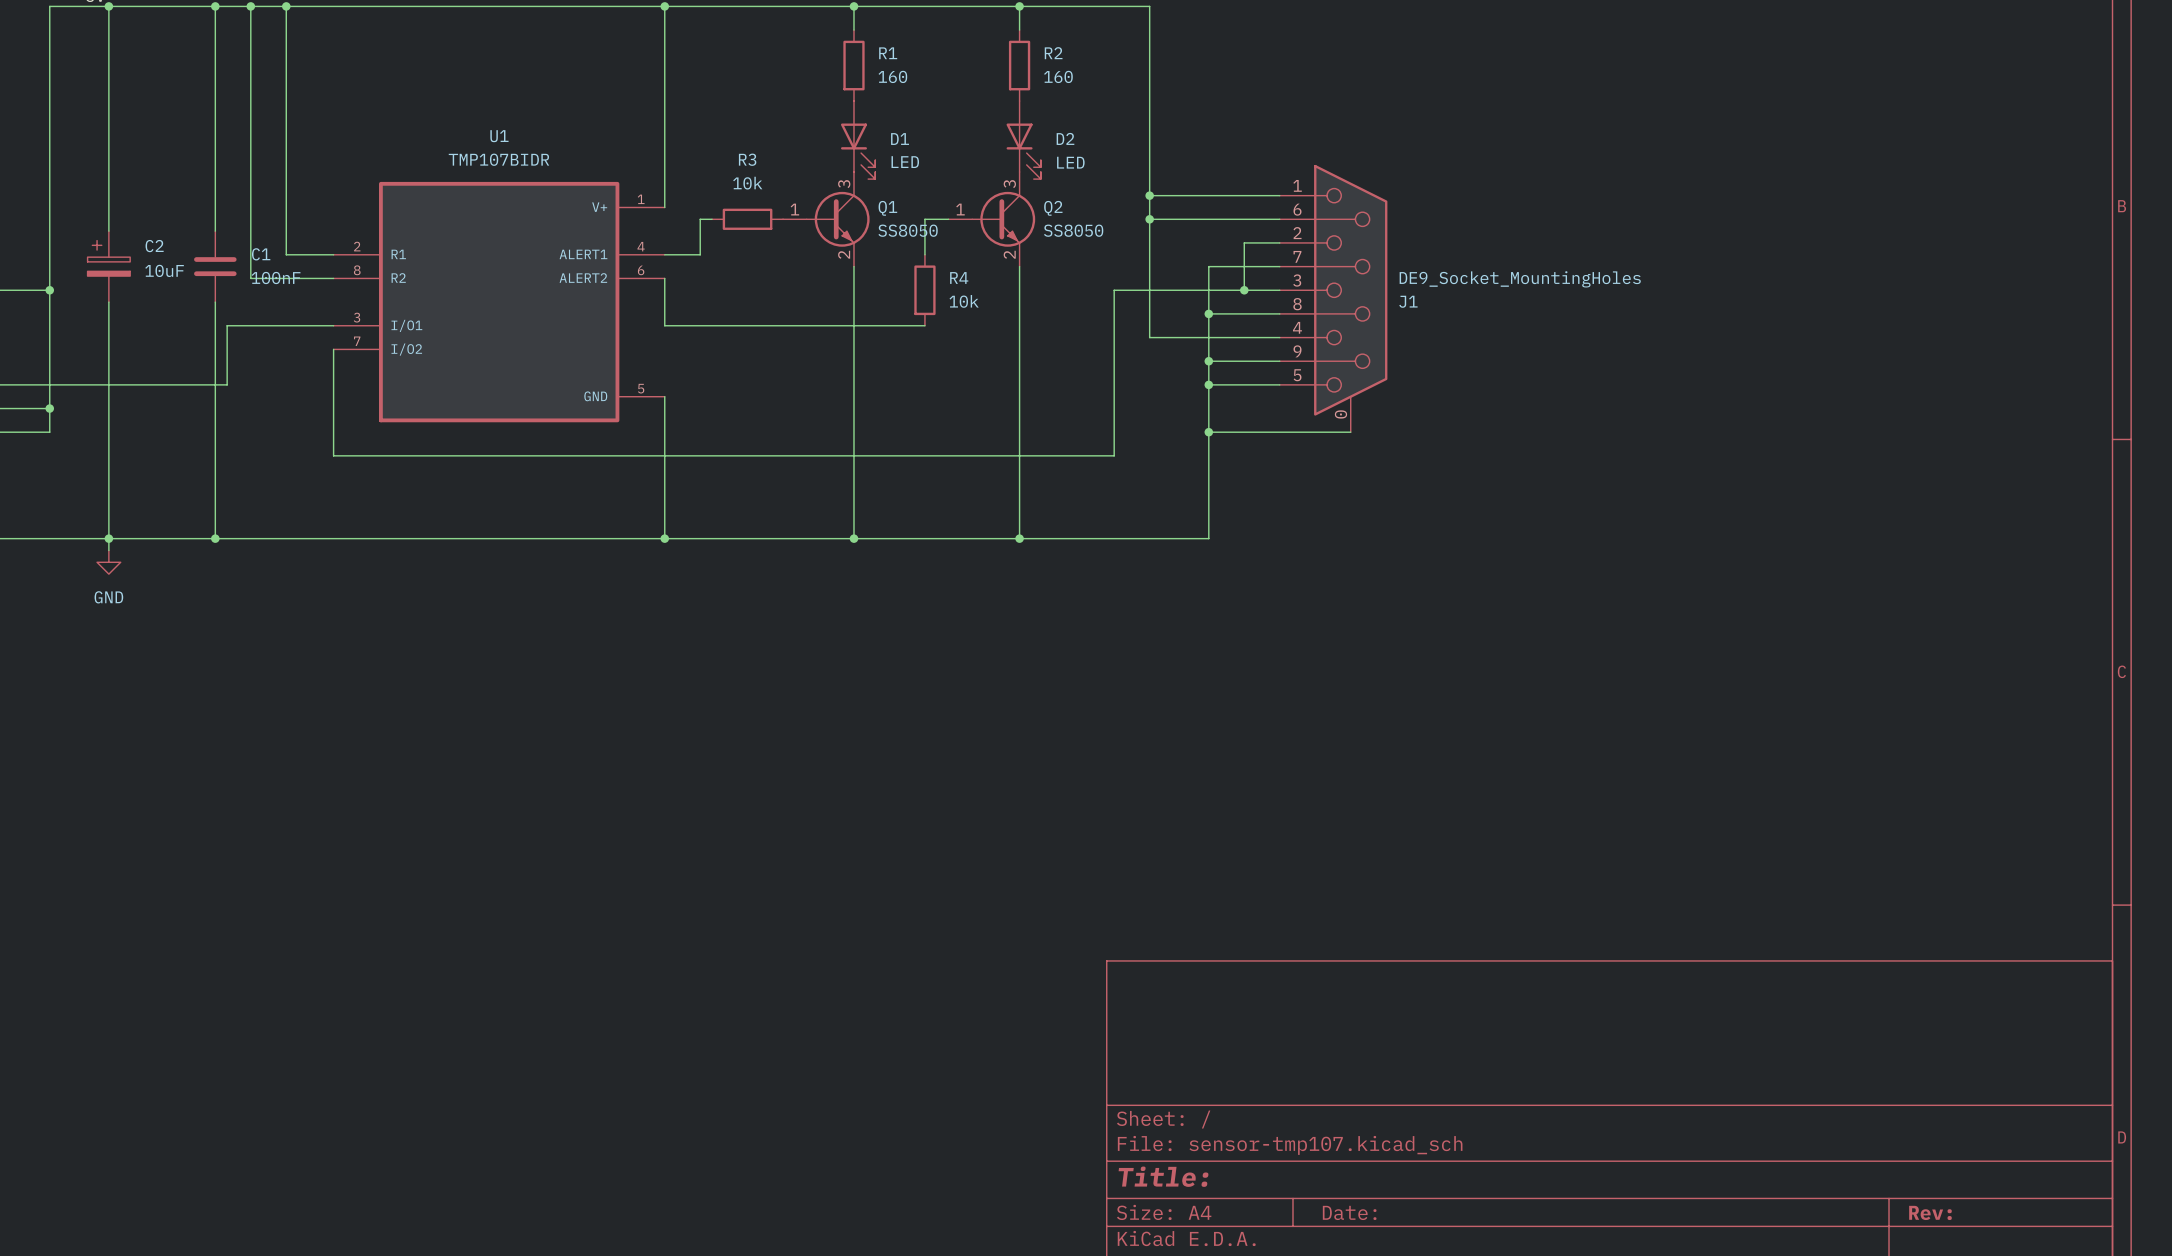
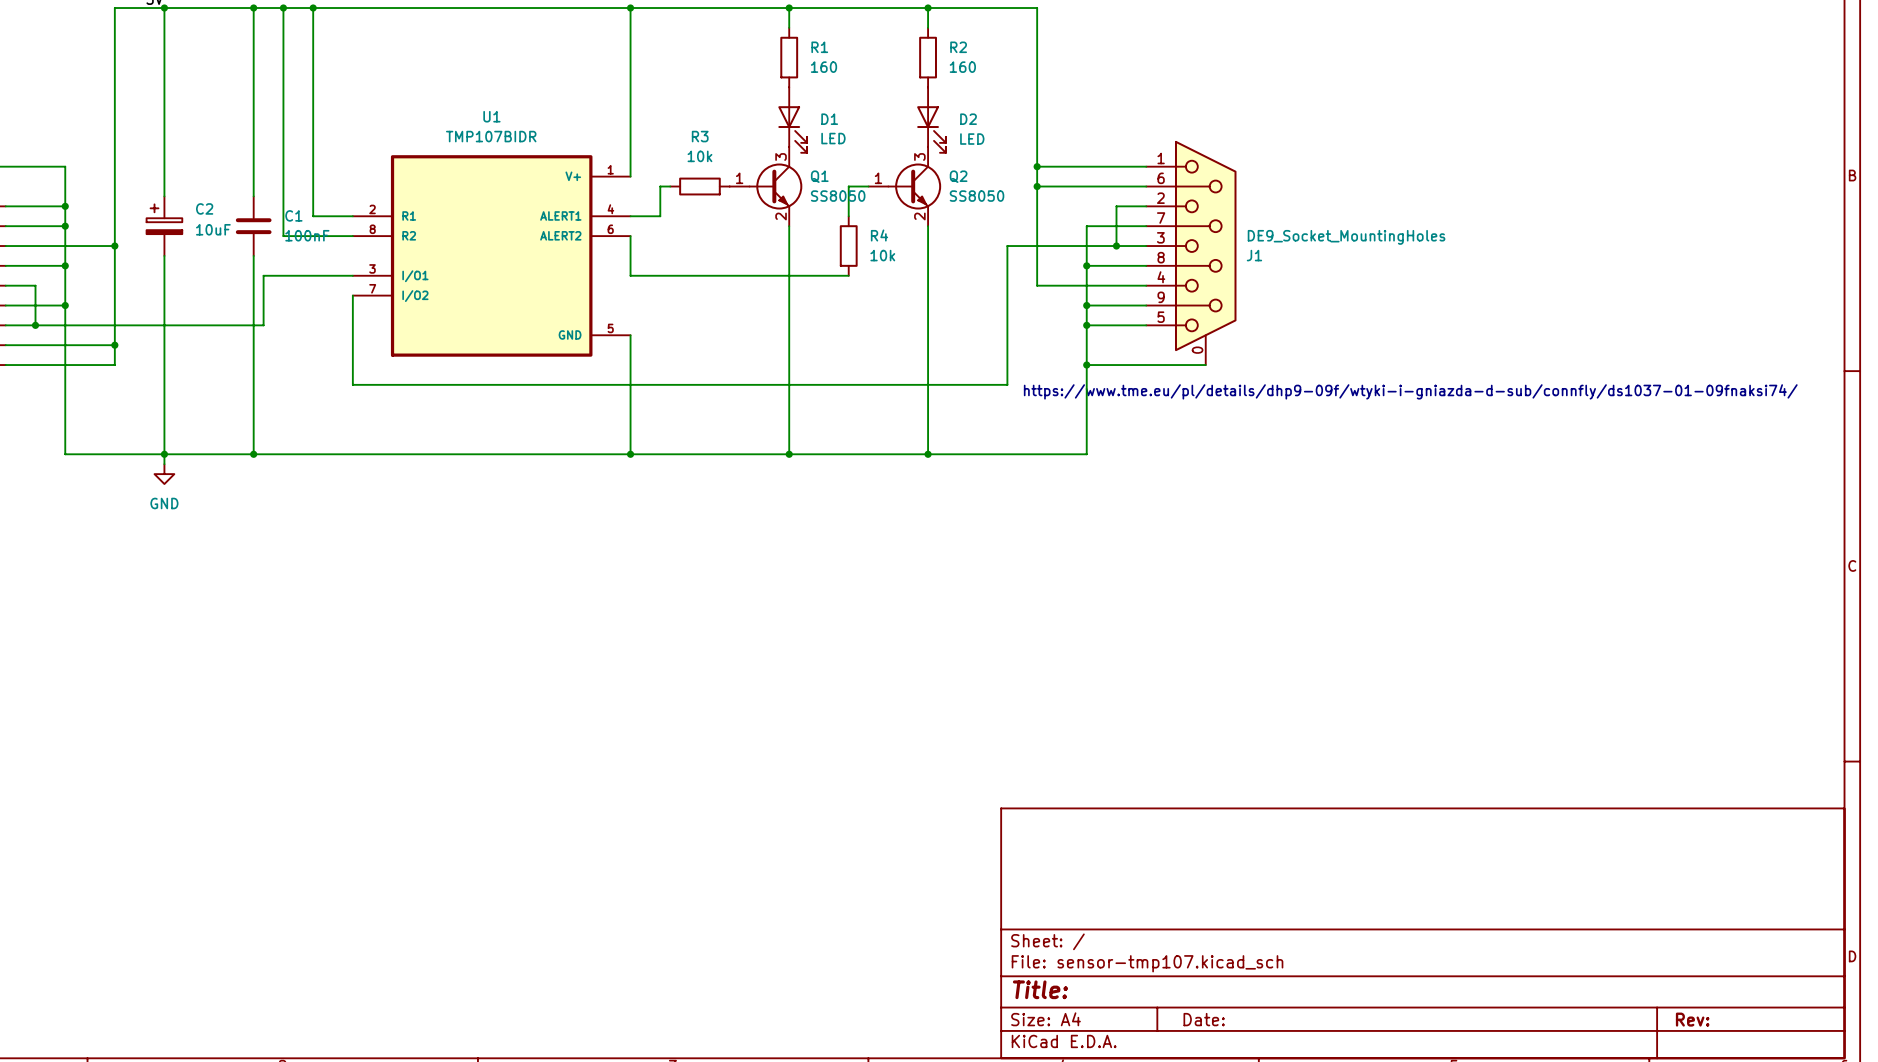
text: none -> https://www.tme.eu/pl/details/dhp9-09f/wtyki-i-gniazda-d-sub/connfly/ds1037-01-09fnaksi74/ (1410, 391)

